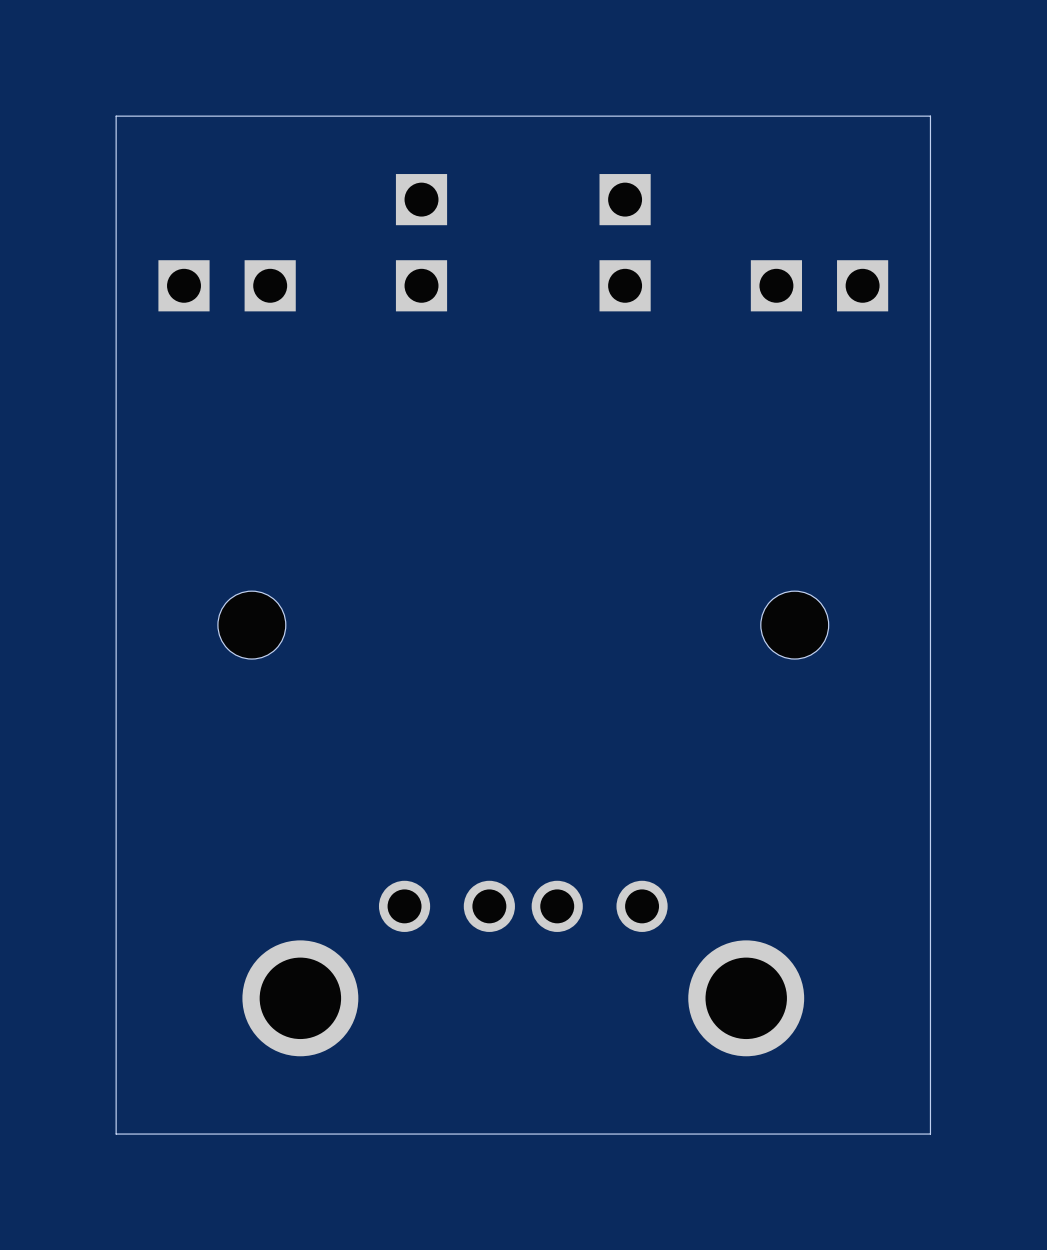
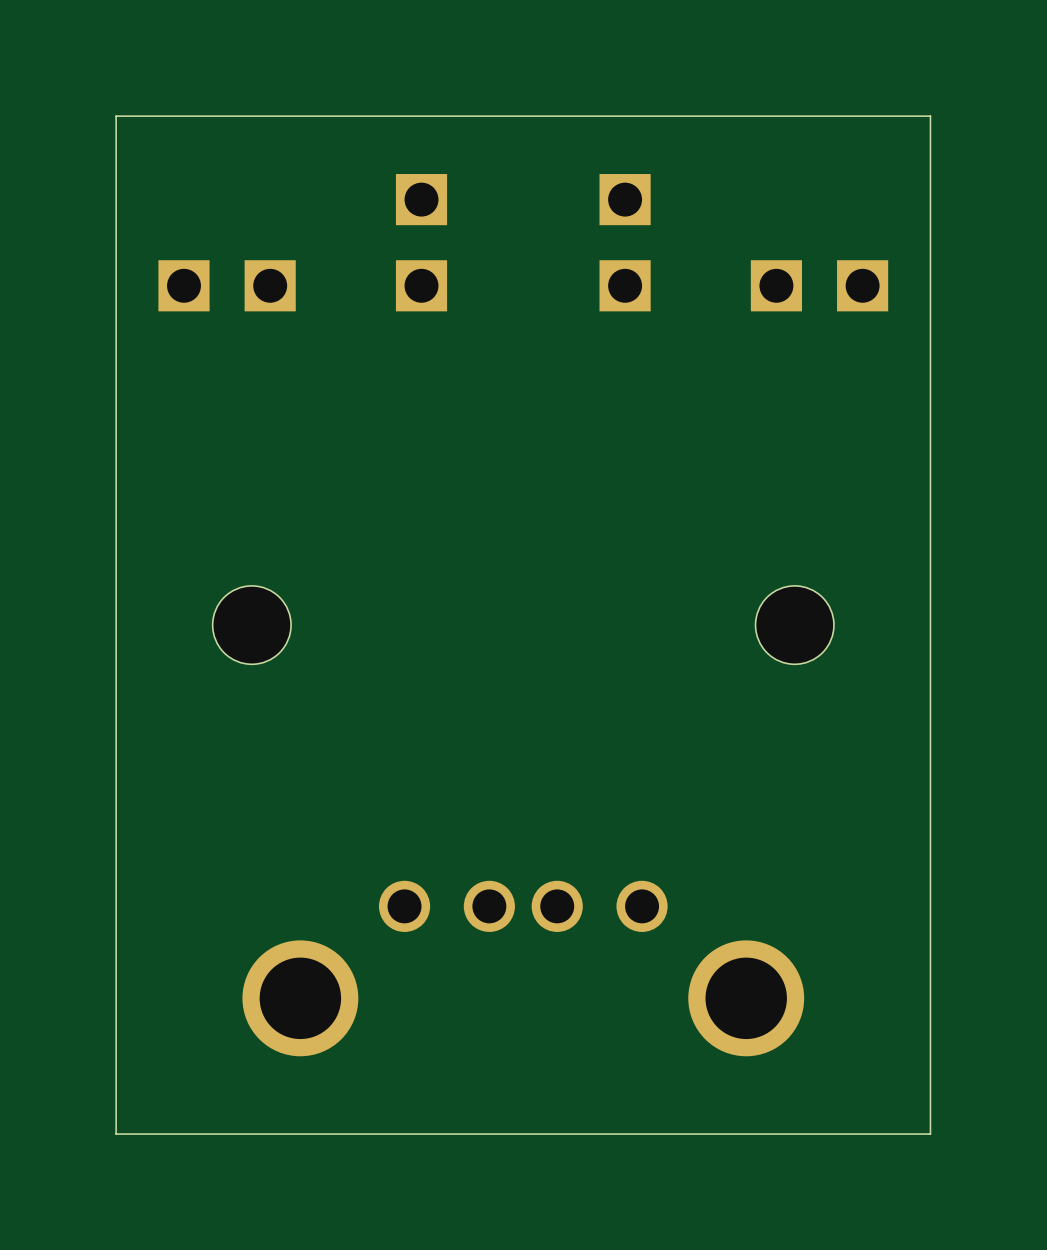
part footprint: [217, 591, 286, 660] -> [212, 585, 292, 665]
part footprint: [760, 591, 829, 660] -> [755, 585, 834, 665]

